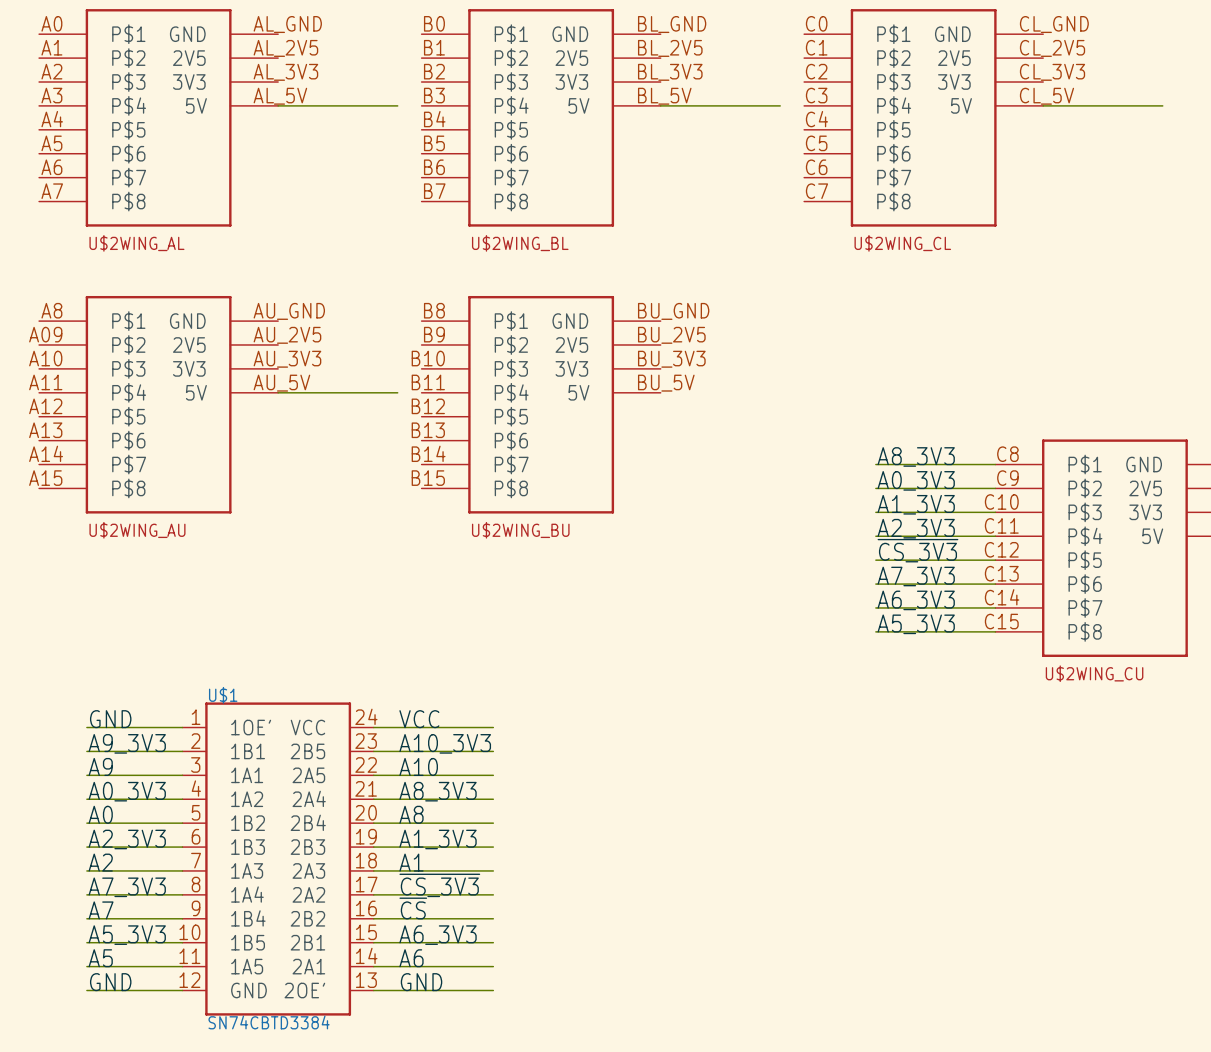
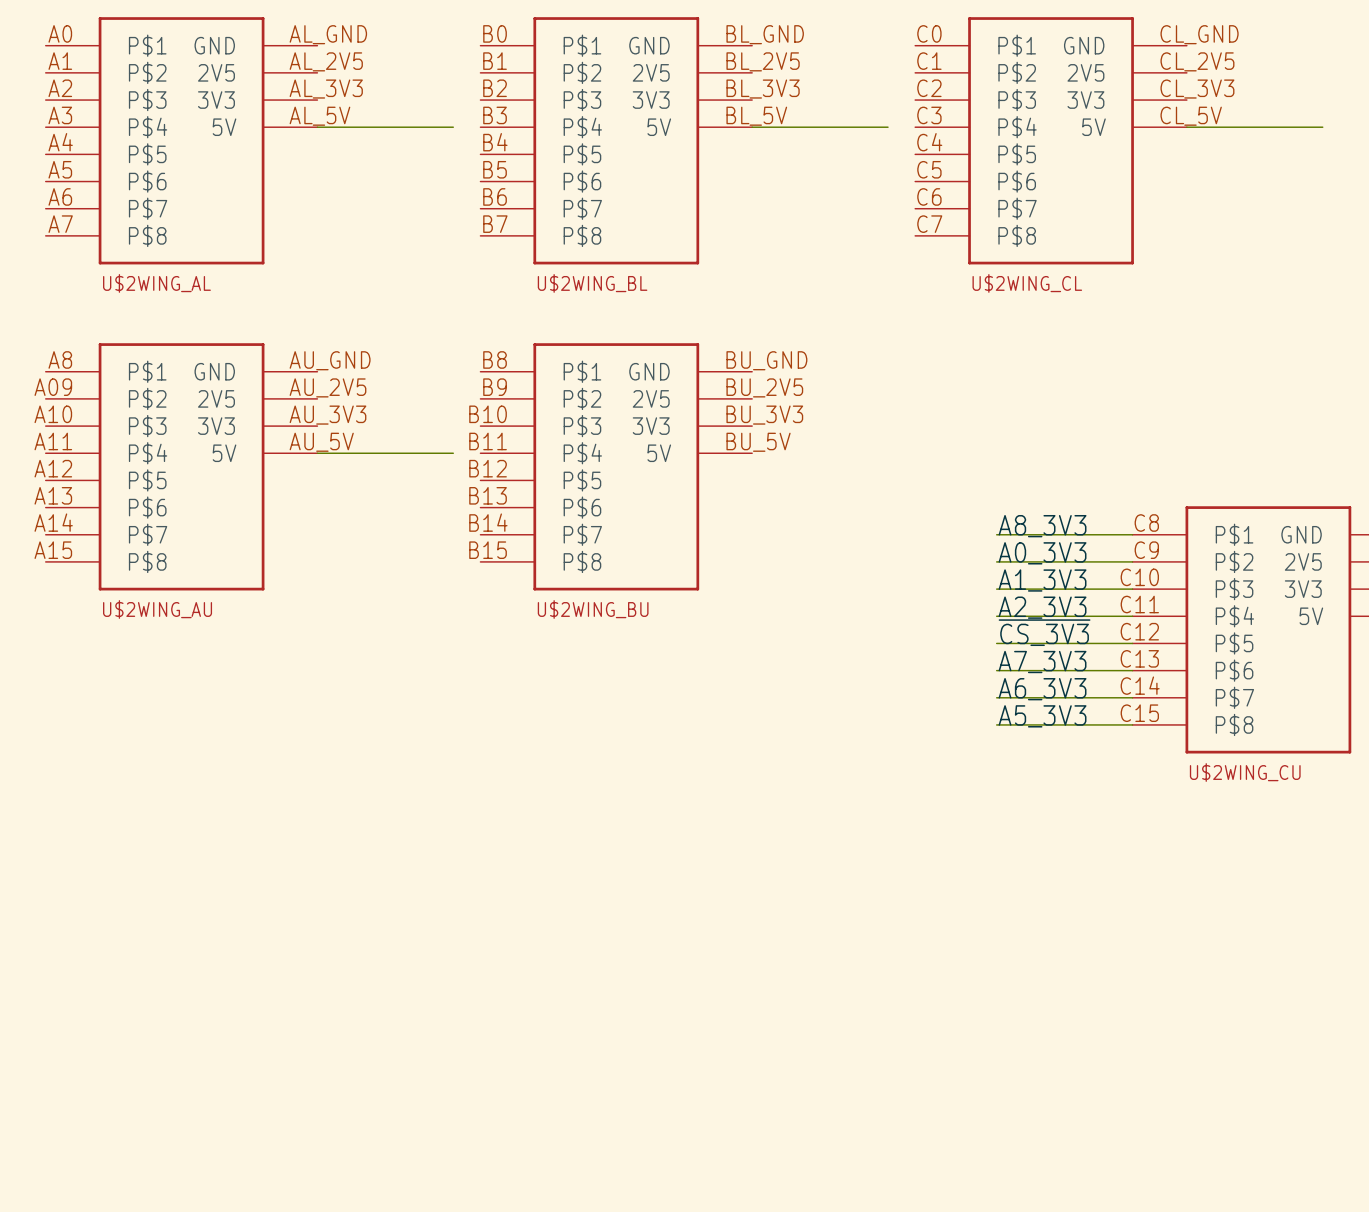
label: GND (110, 719) -> none
label: VCC (419, 719) -> none
wire: (86, 727) (182, 727) -> none
wire: (373, 727) (493, 727) -> none
label: A9_3V3 (127, 743) -> none
label: A10_3V3 (445, 743) -> none
wire: (86, 751) (182, 751) -> none
wire: (373, 751) (493, 751) -> none
label: A9 (100, 766) -> none
label: A10 (418, 766) -> none
wire: (86, 775) (182, 775) -> none
wire: (373, 775) (493, 775) -> none
label: A0_3V3 (127, 791) -> none
label: A8_3V3 (438, 791) -> none
wire: (86, 799) (182, 799) -> none
wire: (373, 799) (493, 799) -> none
label: A0 (100, 814) -> none
label: A8 (411, 814) -> none
wire: (86, 823) (182, 823) -> none
wire: (373, 823) (493, 823) -> none
label: A2_3V3 (127, 839) -> none
label: A1_3V3 (438, 839) -> none
wire: (86, 847) (182, 847) -> none
wire: (373, 847) (493, 847) -> none
U$1: SN74CBTD3384 (278, 859) -> none
label: A2 (100, 862) -> none
label: A1 (411, 862) -> none
wire: (86, 870) (182, 870) -> none
wire: (373, 870) (493, 870) -> none
label: ~{CS_3V3} (439, 885) -> none
label: A7_3V3 (127, 887) -> none
wire: (86, 894) (182, 894) -> none
wire: (373, 894) (493, 894) -> none
label: ~{CS} (413, 908) -> none
label: A7 (101, 910) -> none
wire: (86, 918) (182, 918) -> none
wire: (373, 918) (493, 918) -> none
label: A5_3V3 (127, 935) -> none
label: A6_3V3 (438, 935) -> none
wire: (86, 942) (182, 942) -> none
wire: (373, 942) (493, 942) -> none
label: A5 (100, 958) -> none
label: A6 (411, 958) -> none
wire: (86, 966) (182, 966) -> none
wire: (373, 966) (493, 966) -> none
label: GND (110, 982) -> none
label: GND (421, 982) -> none
wire: (86, 990) (182, 990) -> none
wire: (373, 990) (493, 990) -> none

